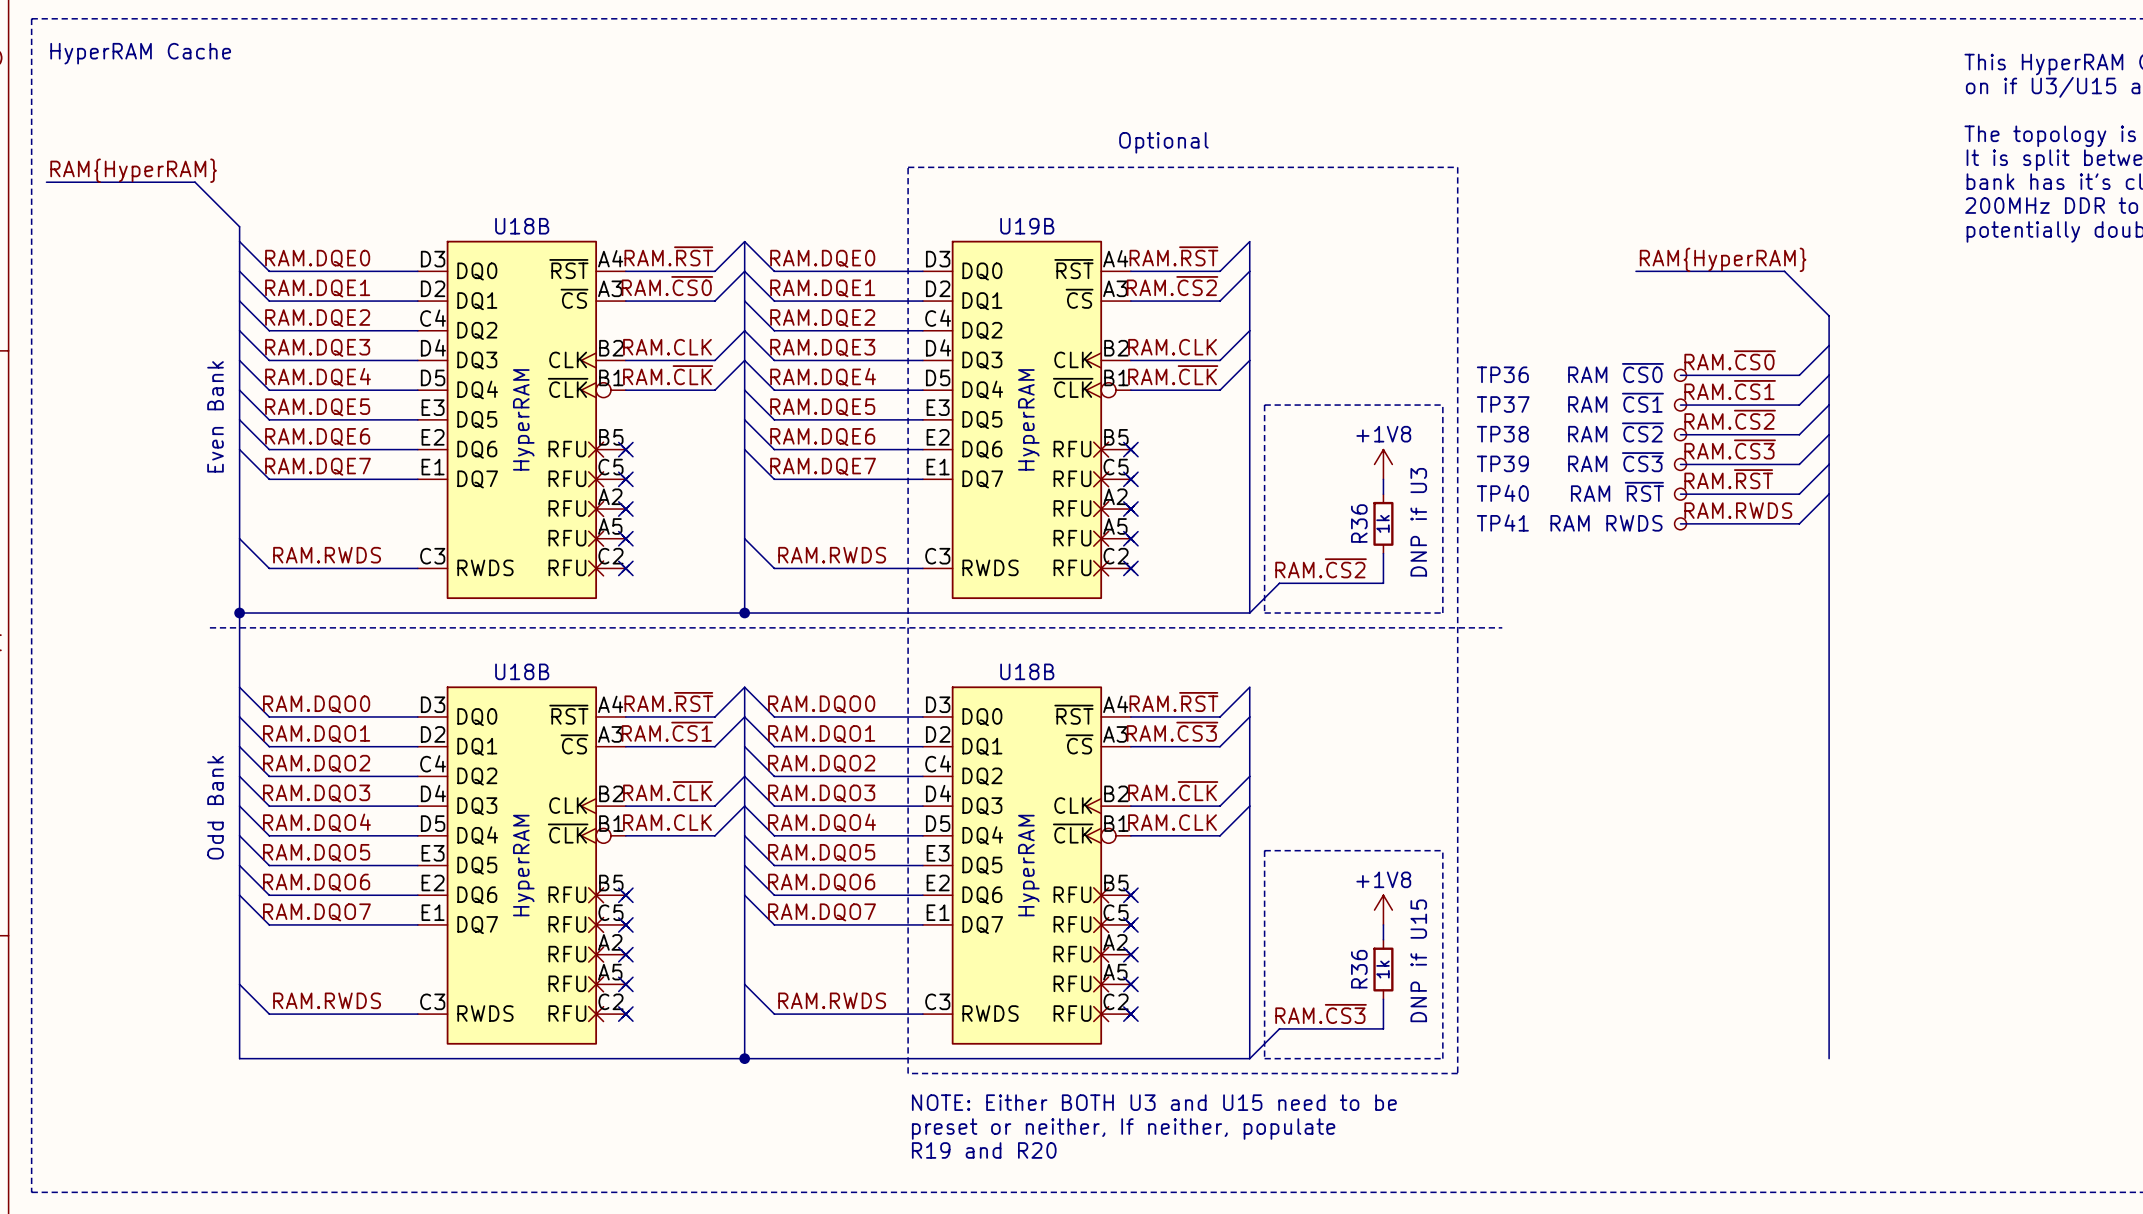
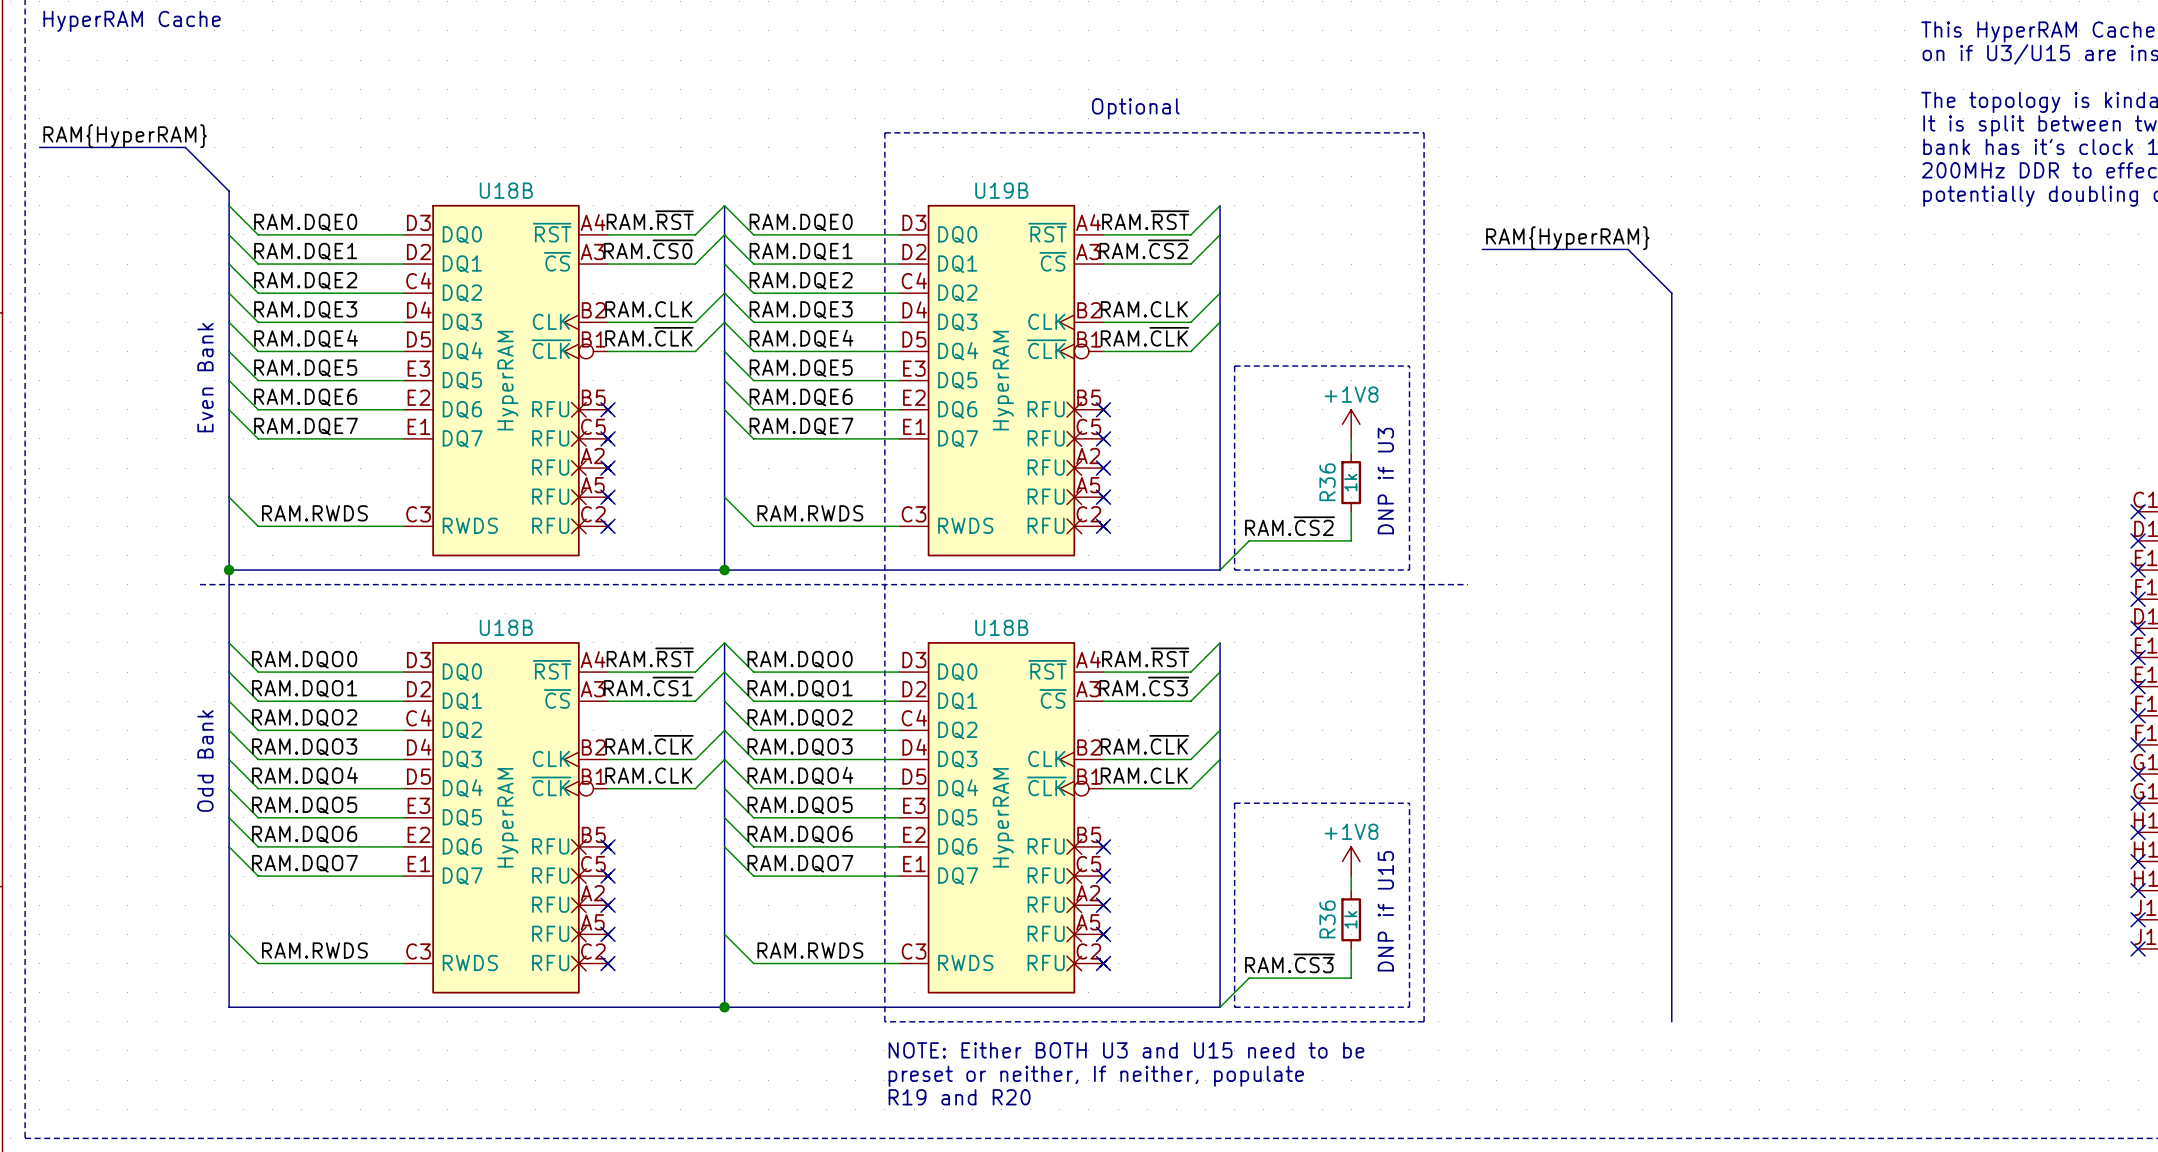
label position: RAM{HyperRAM} (1723, 259) -> RAM{HyperRAM} (1567, 238)
bus: (1635, 271) (1784, 271) (1829, 315) (1829, 1058) -> (1482, 249) (1628, 249) (1671, 293) (1671, 1021)
wire: (1829, 345) (1799, 375) (1680, 375) -> none
label: RAM.~{CS0} (1730, 360) -> none
TP36: RAM ~{CS0} (1680, 375) -> none
wire: (1829, 375) (1799, 405) (1680, 405) -> none
label: RAM.~{CS1} (1730, 390) -> none
TP37: RAM ~{CS1} (1680, 405) -> none
wire: (1829, 405) (1799, 434) (1680, 434) -> none
label: RAM.~{CS2} (1730, 419) -> none
TP38: RAM ~{CS2} (1680, 434) -> none
wire: (1829, 434) (1799, 464) (1680, 464) -> none
label: RAM.~{CS3} (1730, 449) -> none
TP39: RAM ~{CS3} (1680, 464) -> none
wire: (1829, 464) (1799, 494) (1680, 494) -> none
label: RAM.~{RST} (1728, 479) -> none
TP40: RAM ~{RST} (1680, 494) -> none
wire: (1829, 494) (1799, 523) (1680, 523) -> none
label: RAM.RWDS (1738, 510) -> none
TP41: RAM RWDS (1680, 523) -> none

